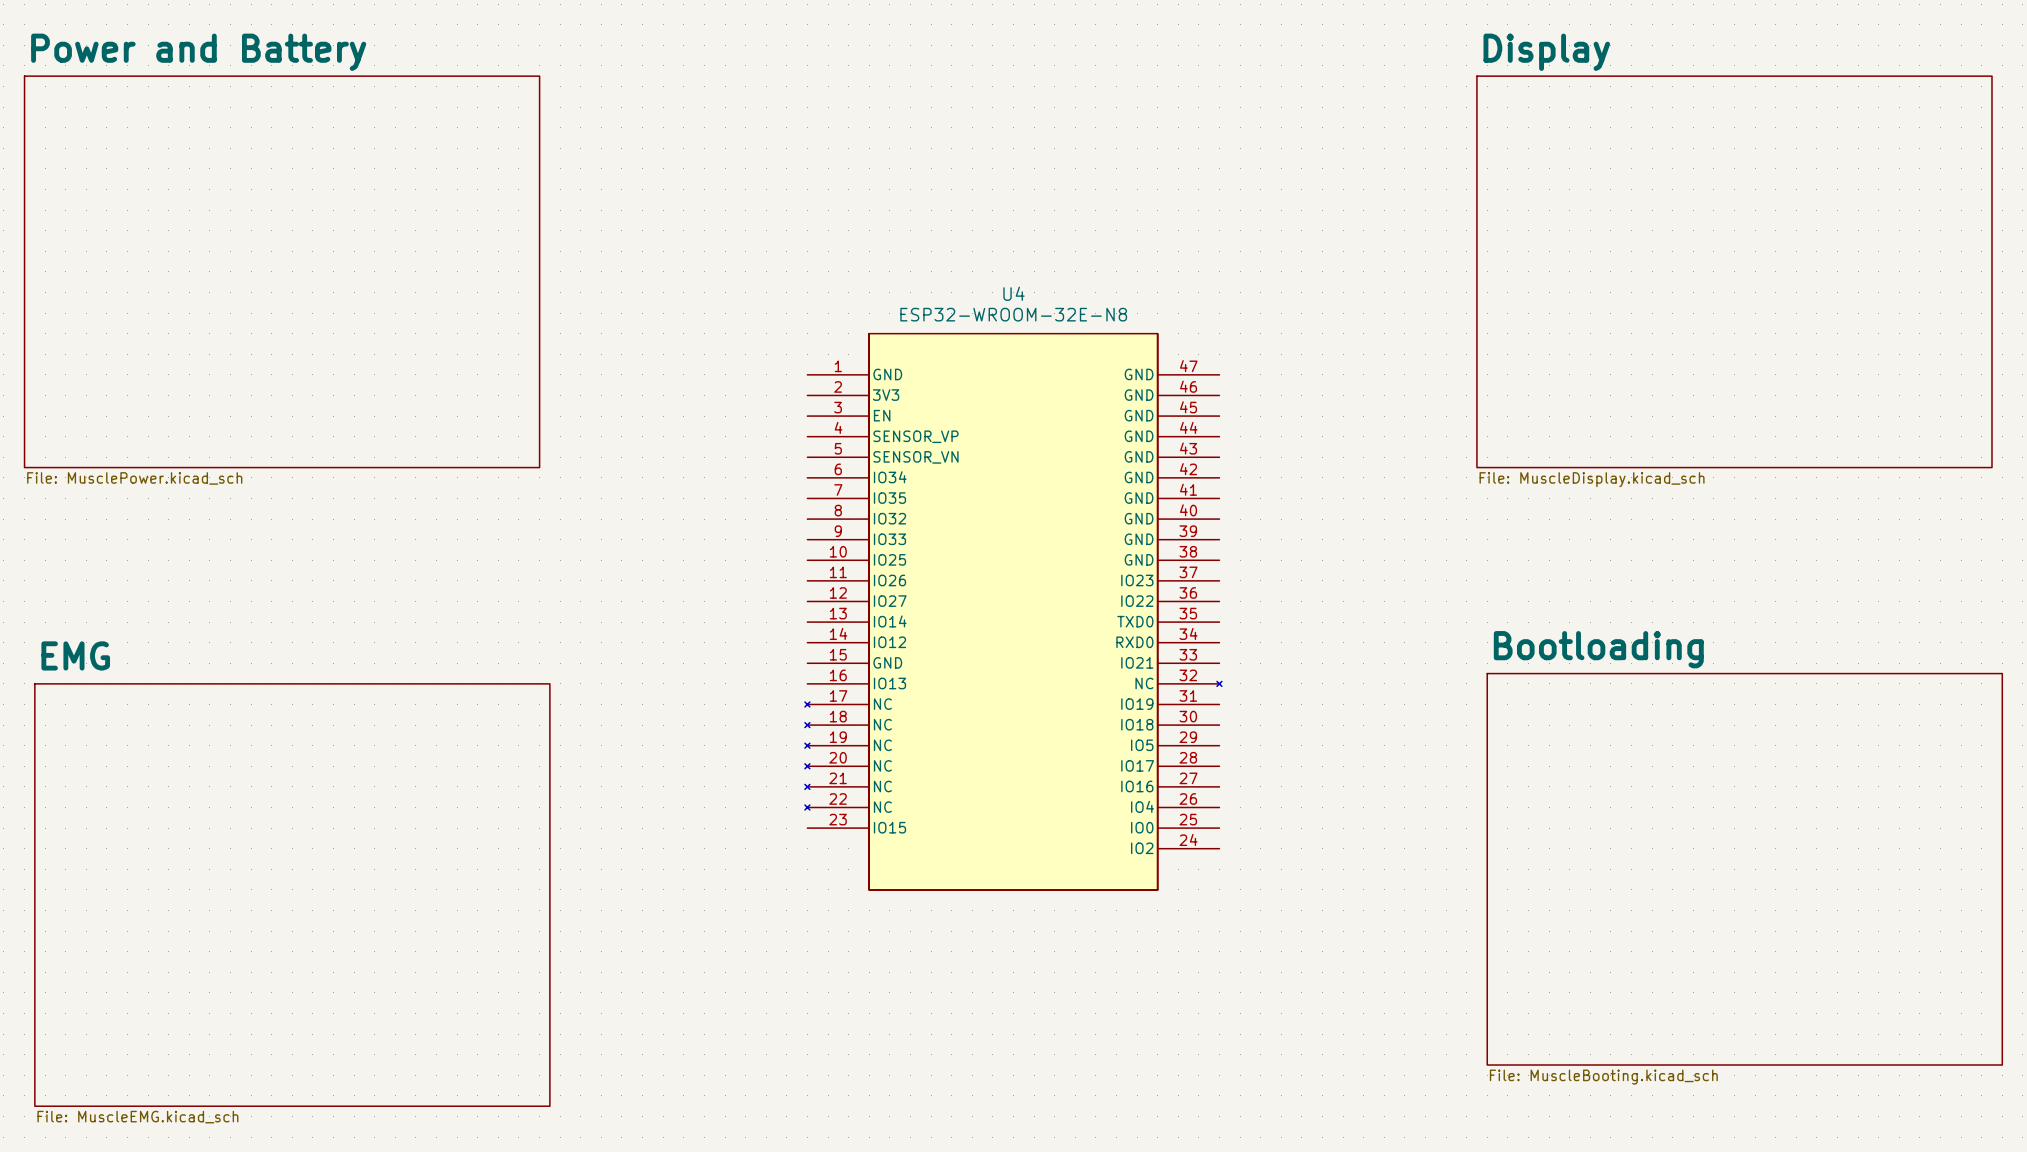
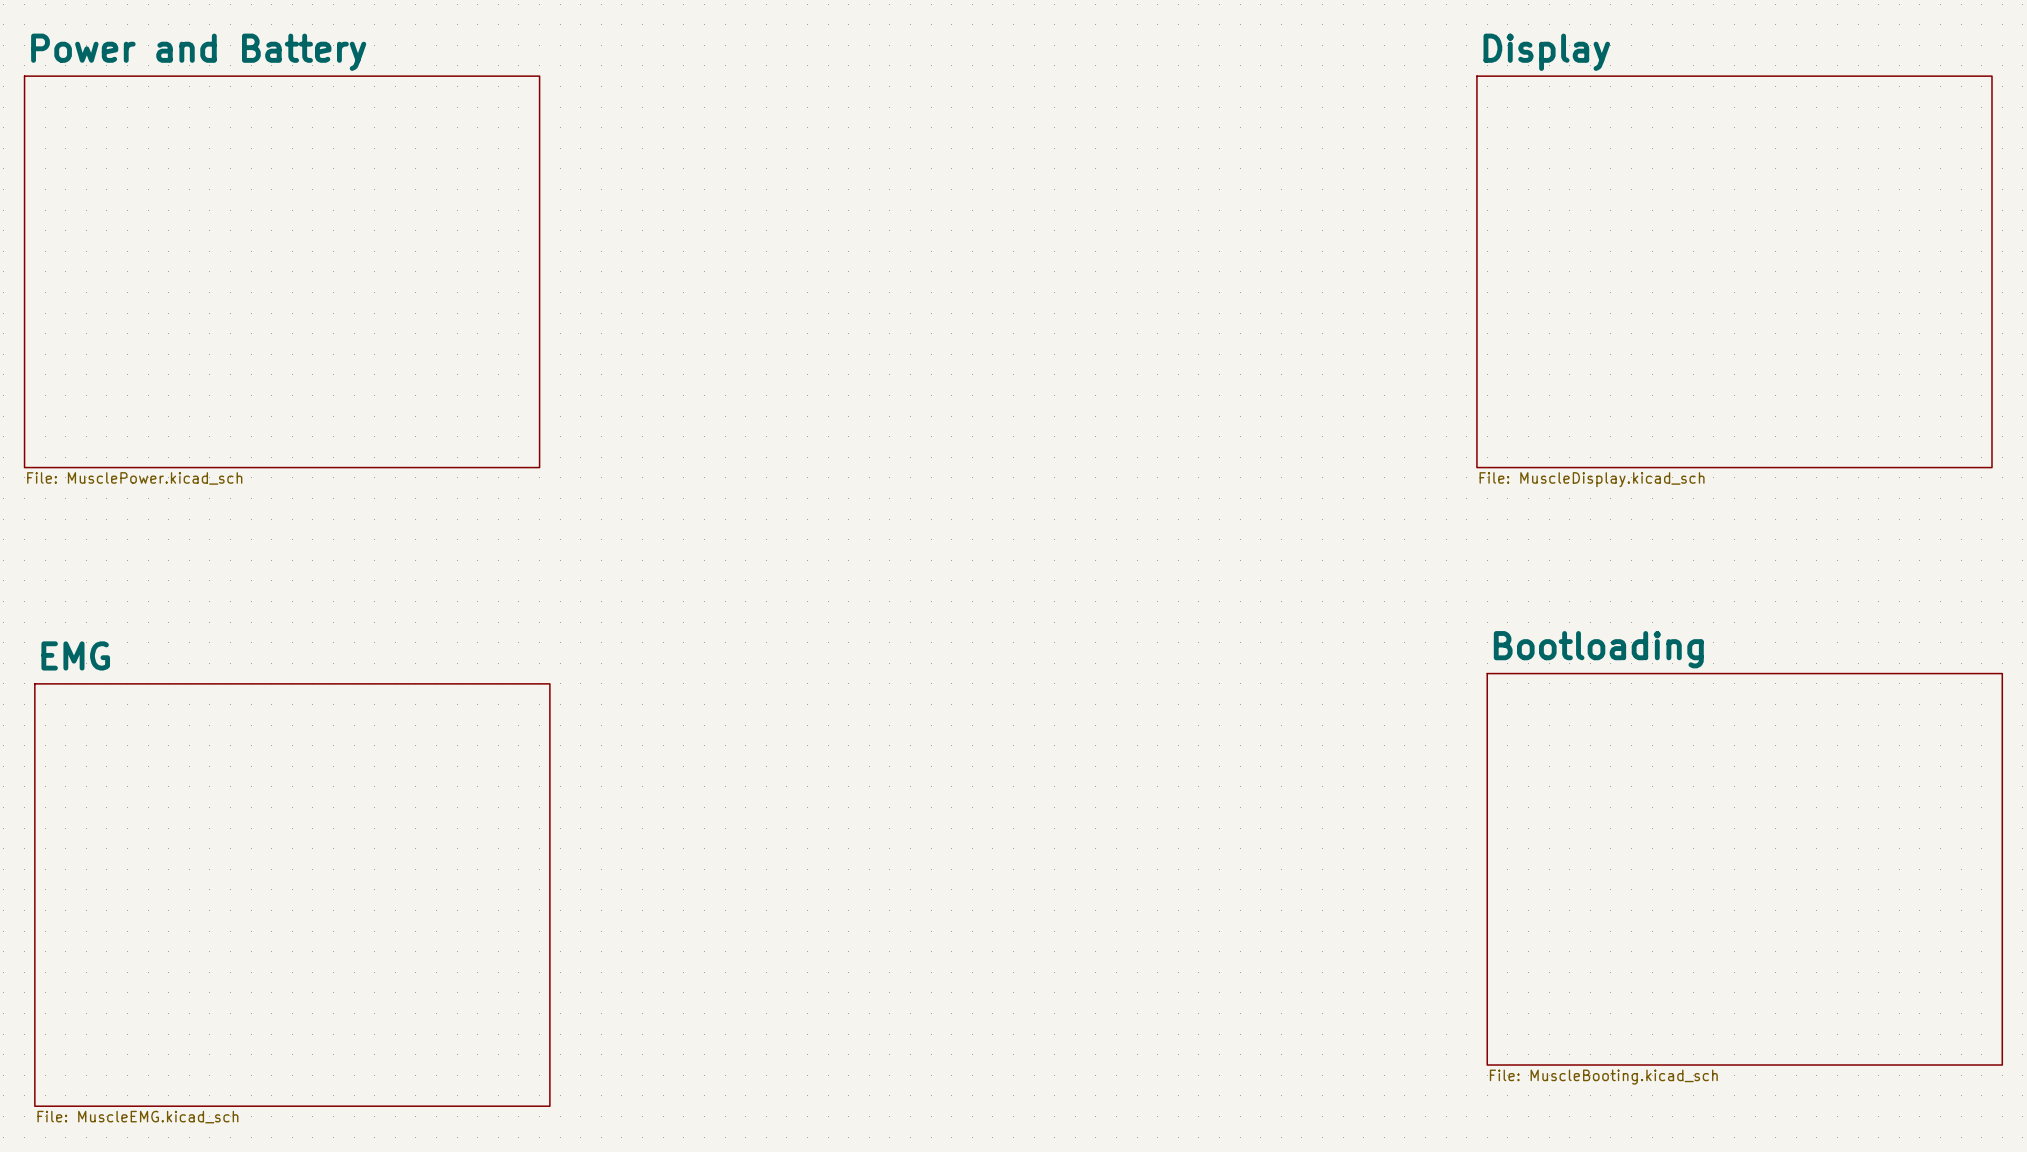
U4: ESP32-WROOM-32E-N8 (1013, 611) -> none

